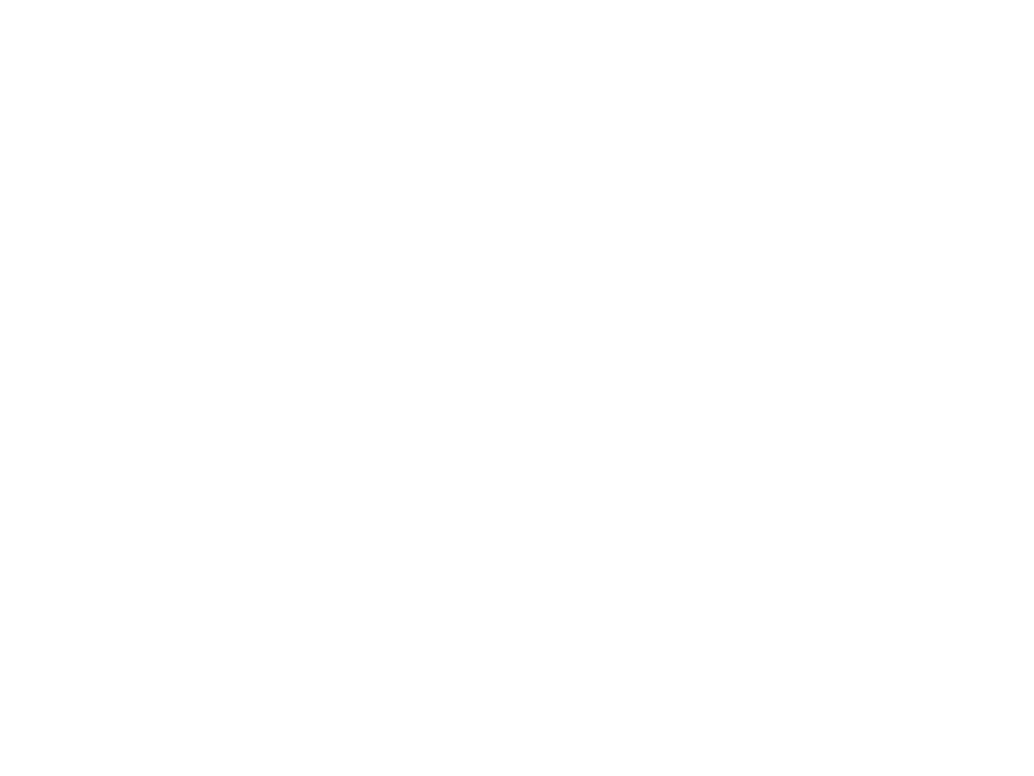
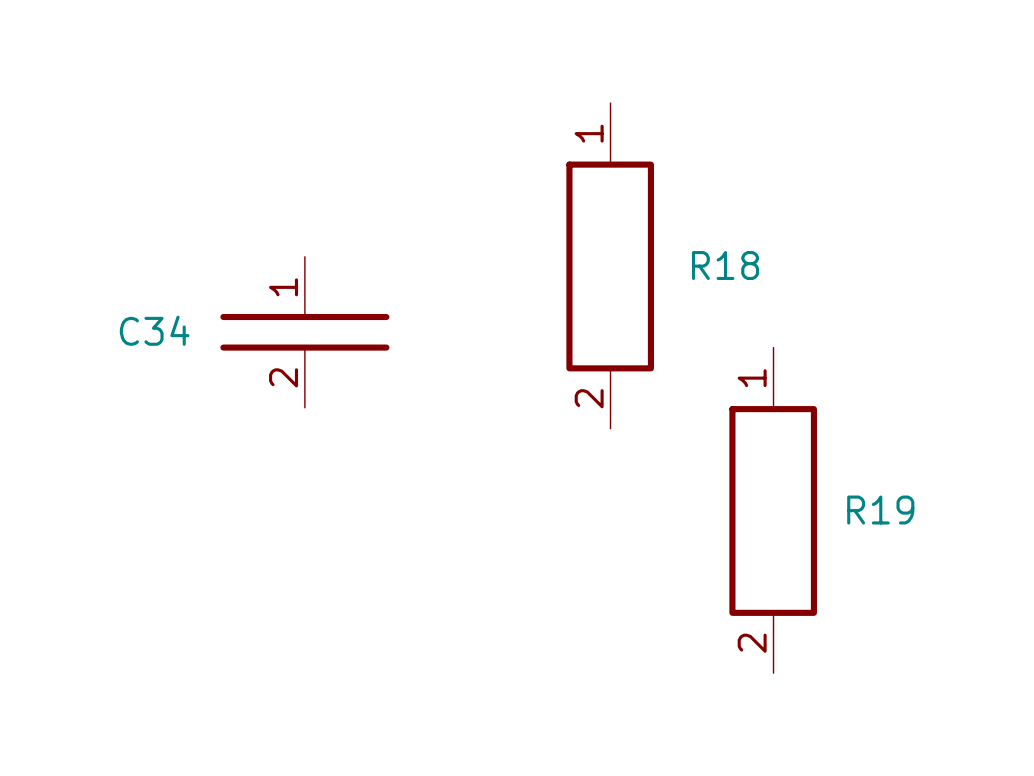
R18: none -> (610, 265)
C34: none -> (304, 332)
R19: none -> (773, 510)

